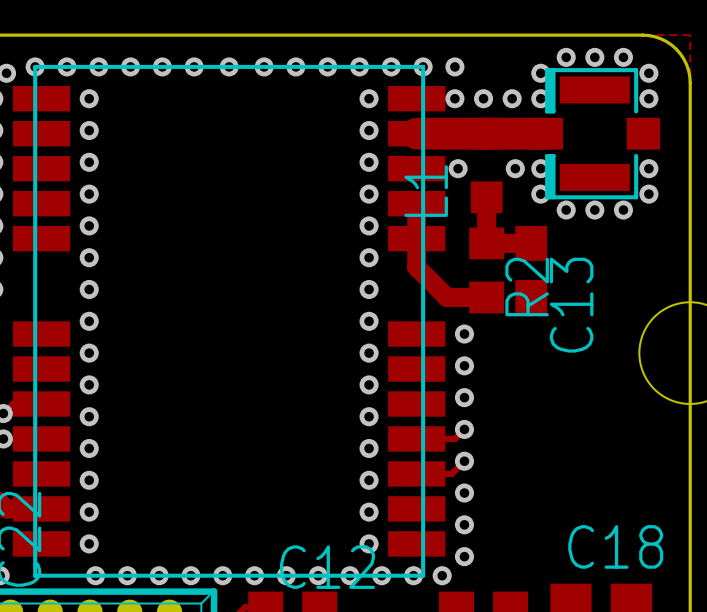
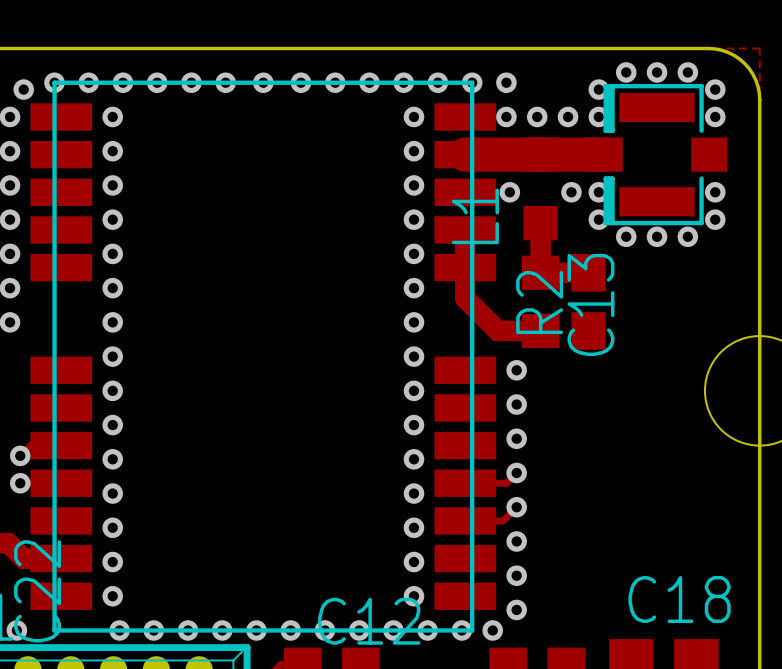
R2 name position: R2 (527, 286) -> R2 (539, 302)
C13 name position: C13 (571, 305) -> C13 (590, 304)

